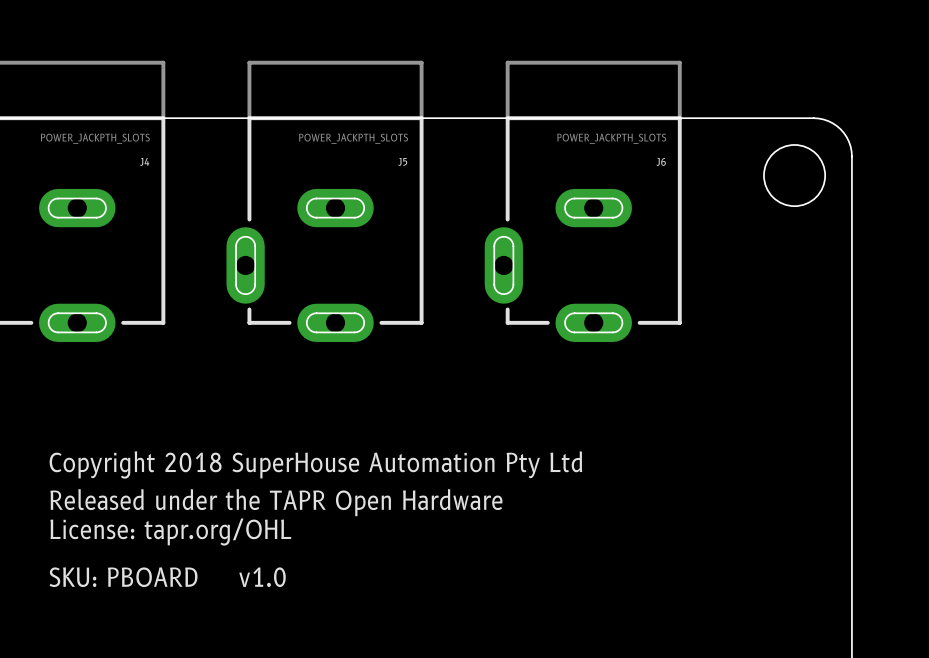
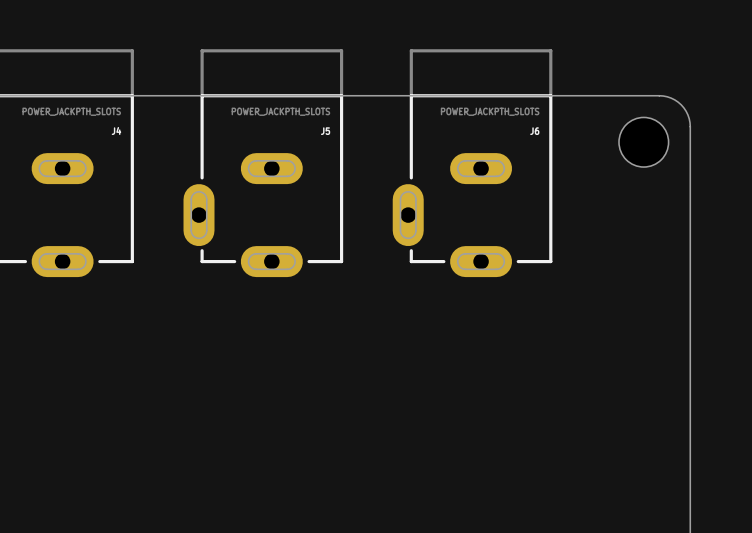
text: Copyright 2018 SuperHouse Automation Pty Ltd (315, 464) -> none
text: Released under the TAPR Open Hardware (276, 502) -> none
text: License: tapr.org/OHL (170, 532) -> none
text: SKU: PBOARD v1.0 (167, 577) -> none

